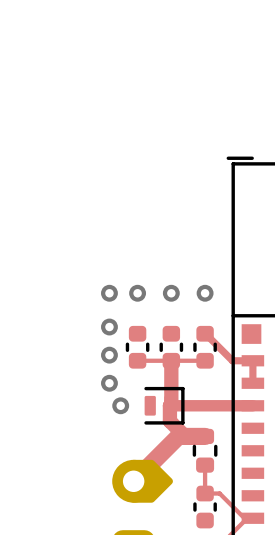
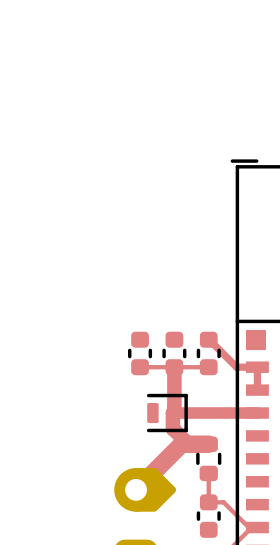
via: (109, 293) -> none
via: (137, 293) -> none
via: (171, 293) -> none
via: (205, 293) -> none
via: (109, 327) -> none
via: (109, 355) -> none
via: (109, 383) -> none
via: (120, 405) -> none

